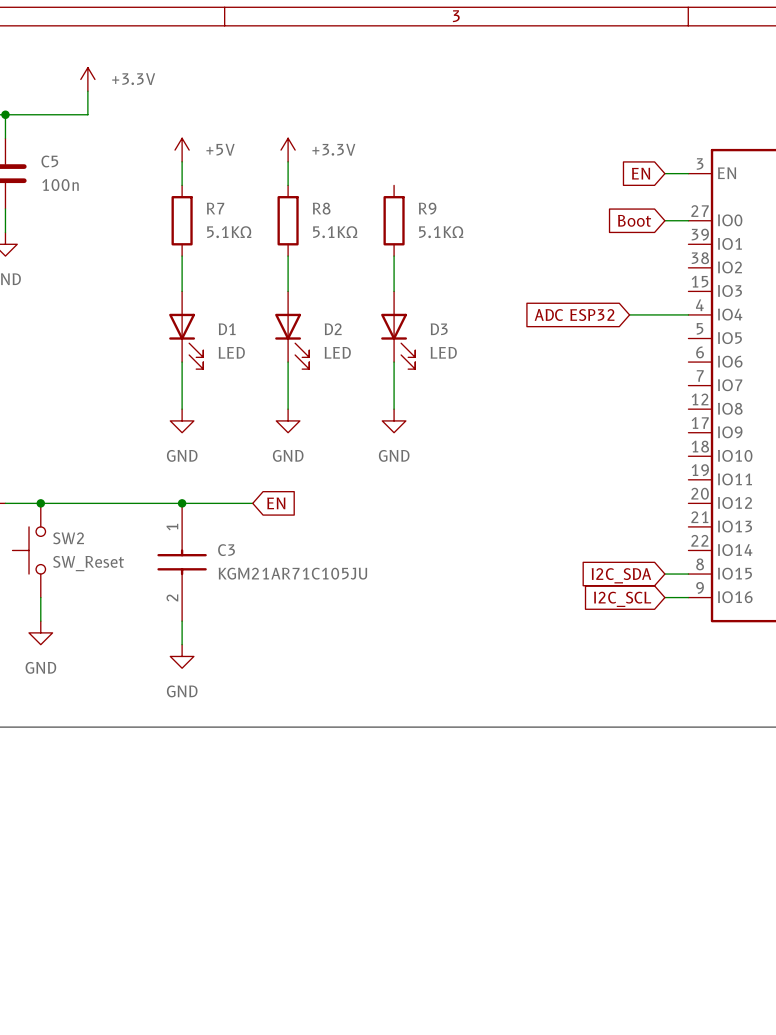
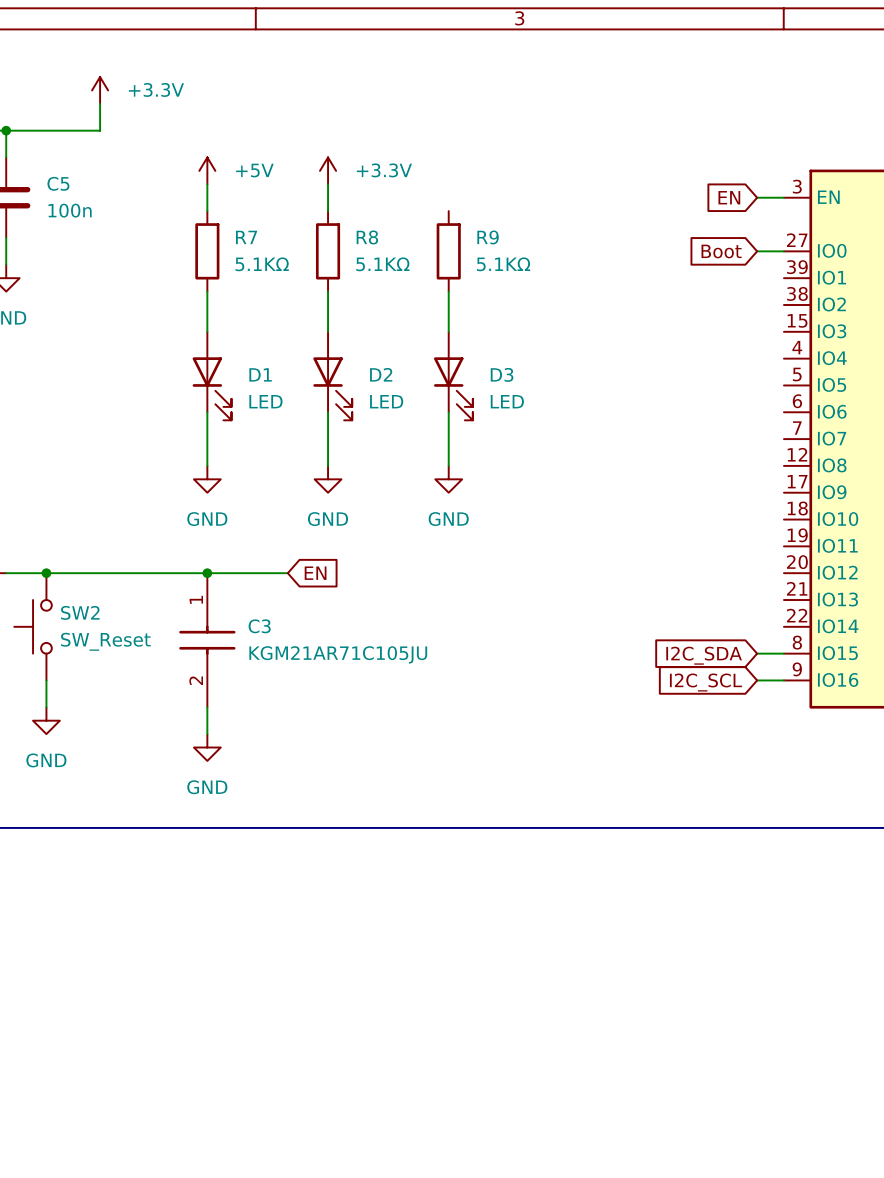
wire: (629, 314) (688, 314) -> none
global label: ADC ESP32 (574, 315) -> none

